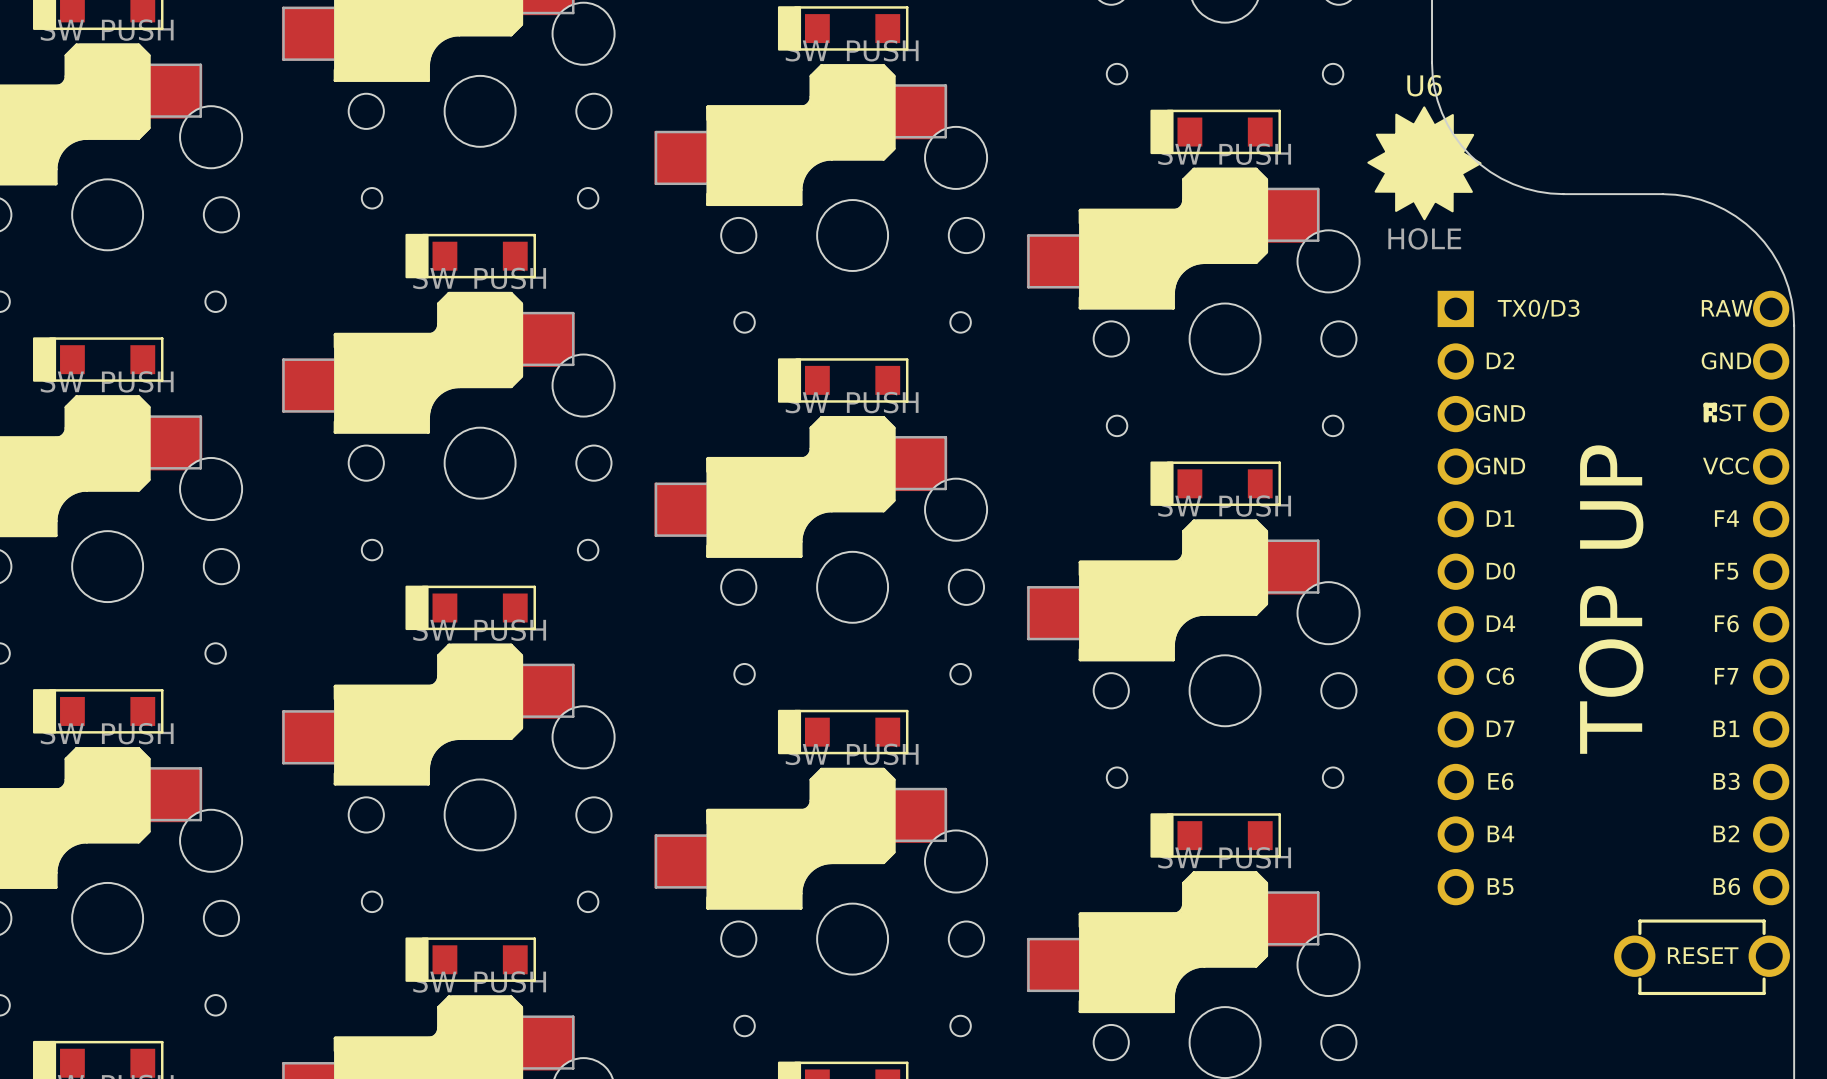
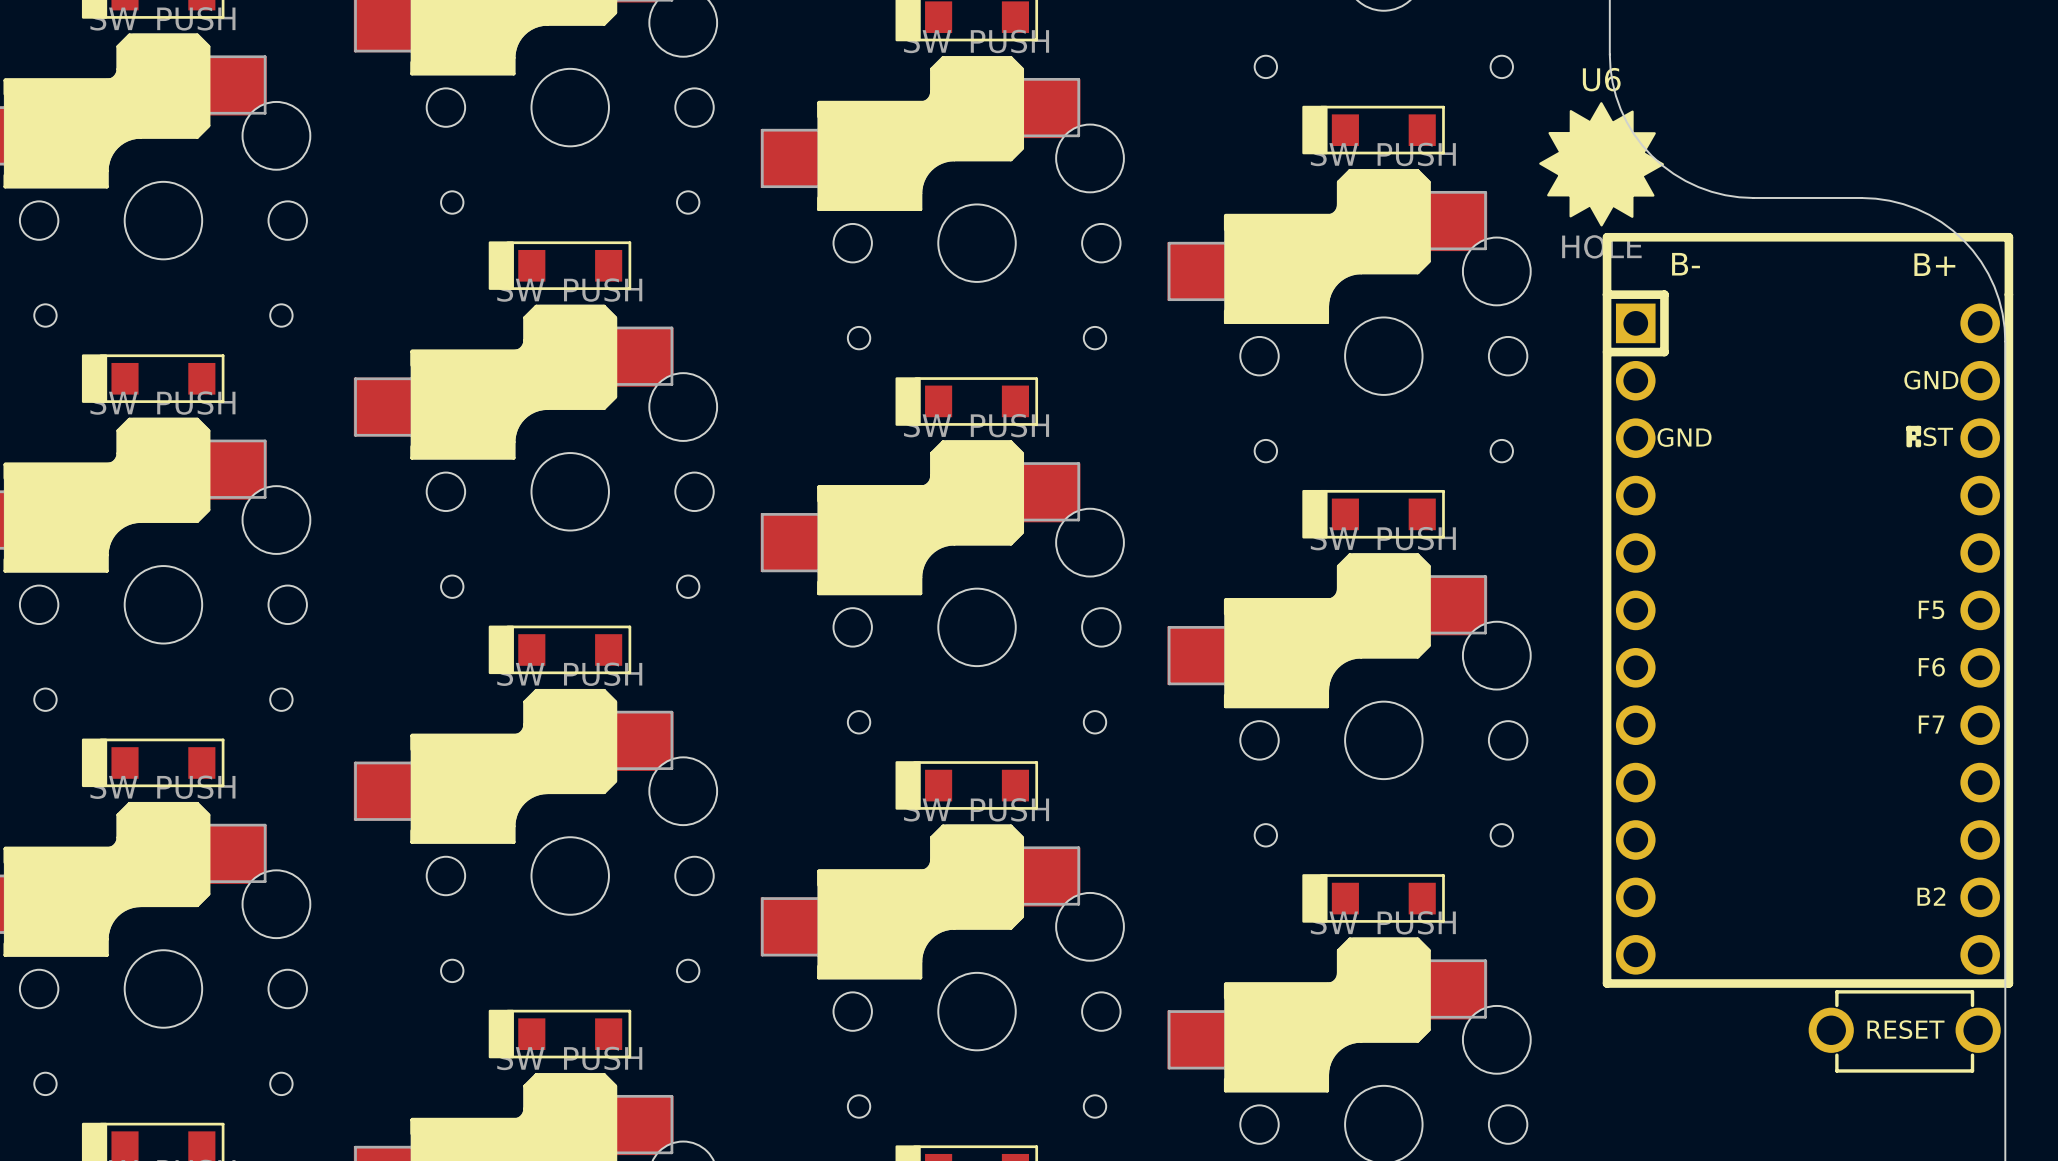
part: none -> (1807, 610)
part: (1613, 598) -> none

